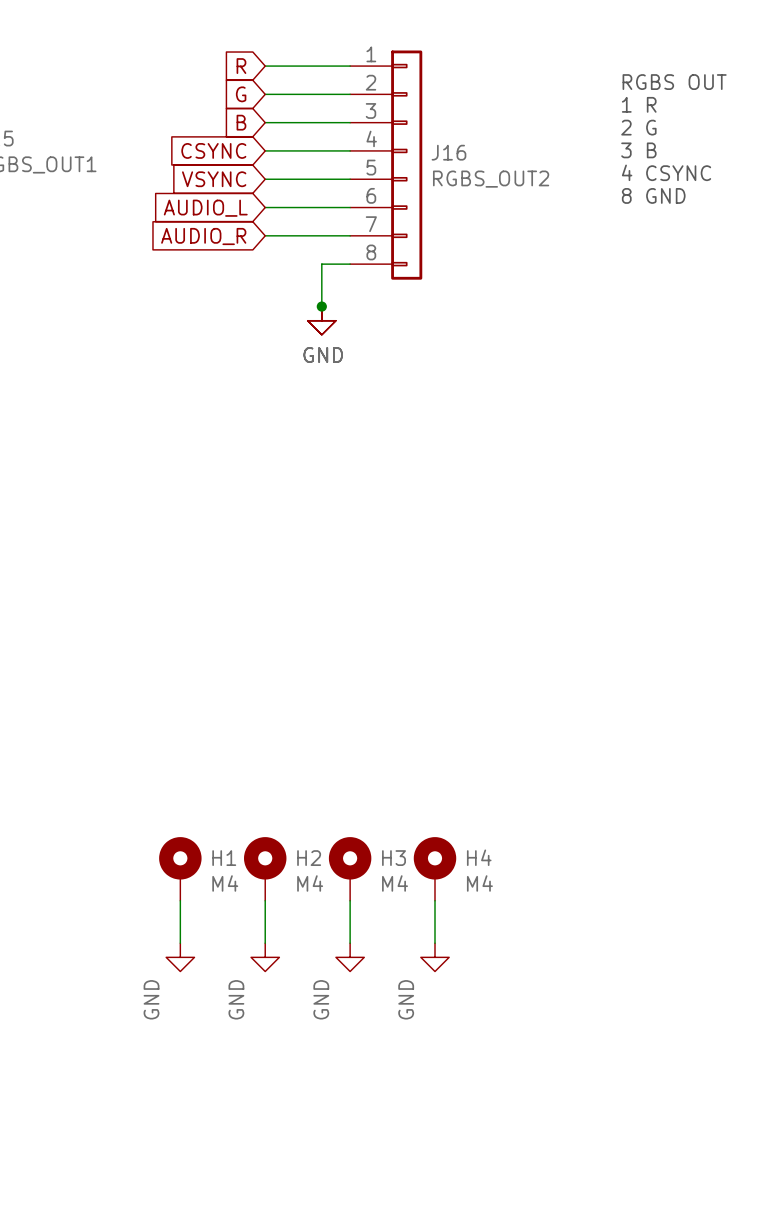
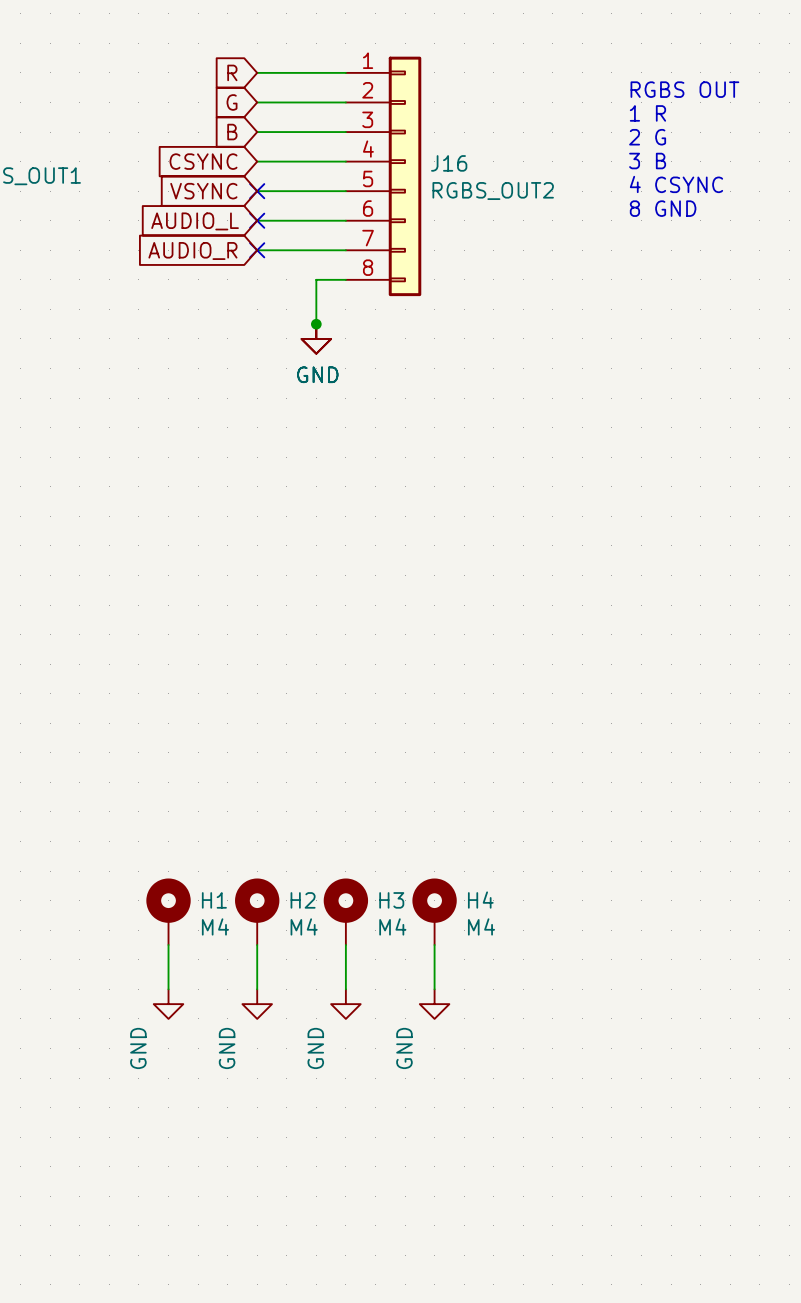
no-connect mark: none -> (257, 191)
no-connect mark: none -> (257, 220)
no-connect mark: none -> (257, 250)

